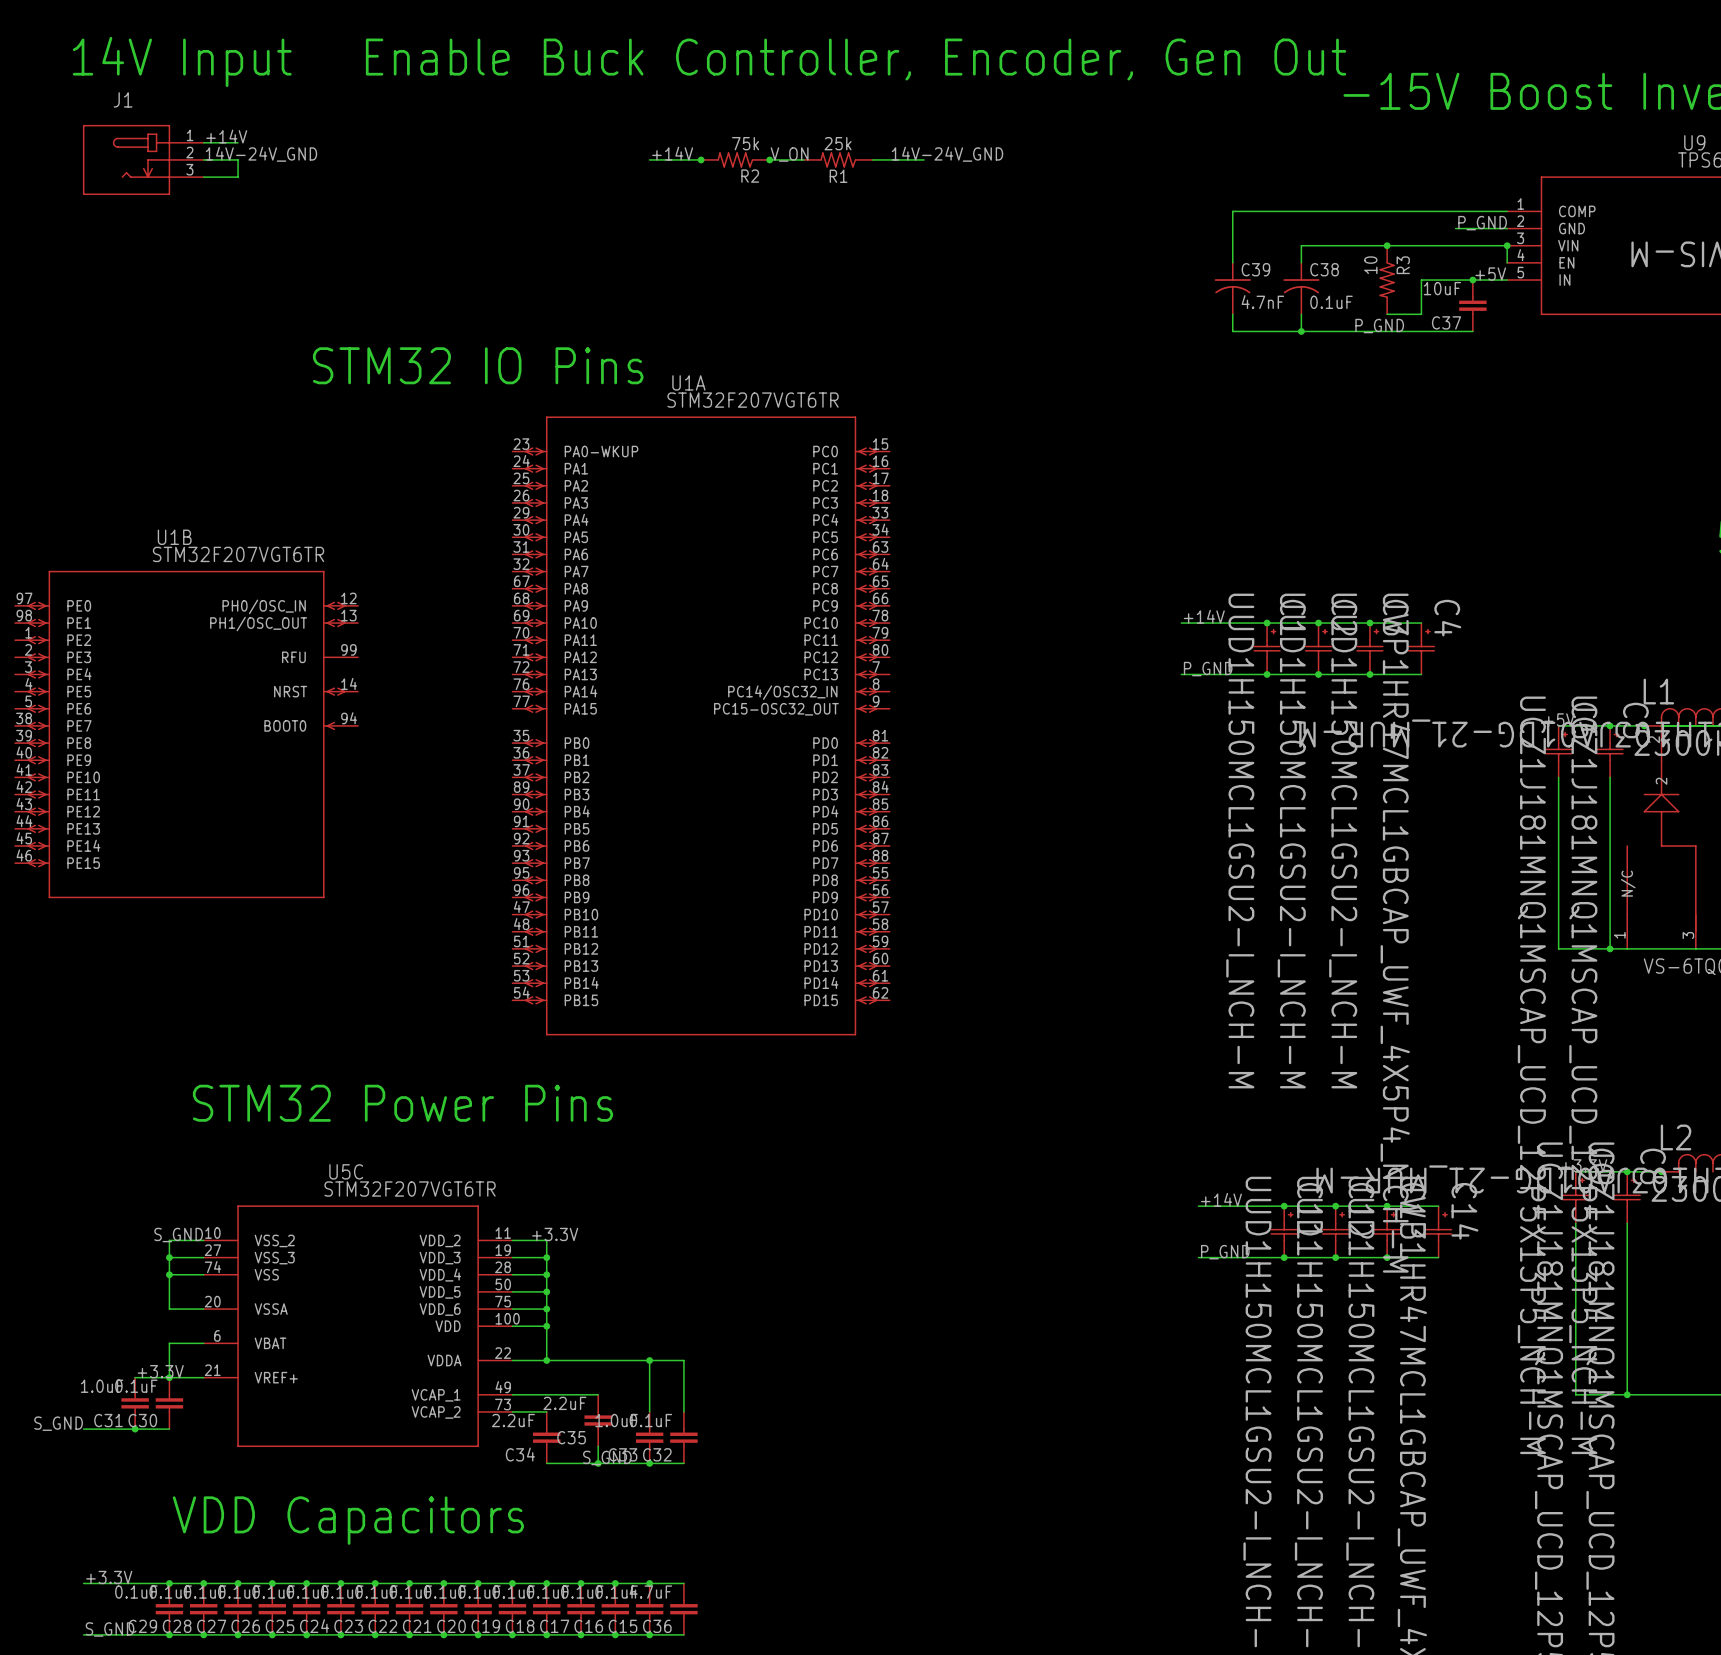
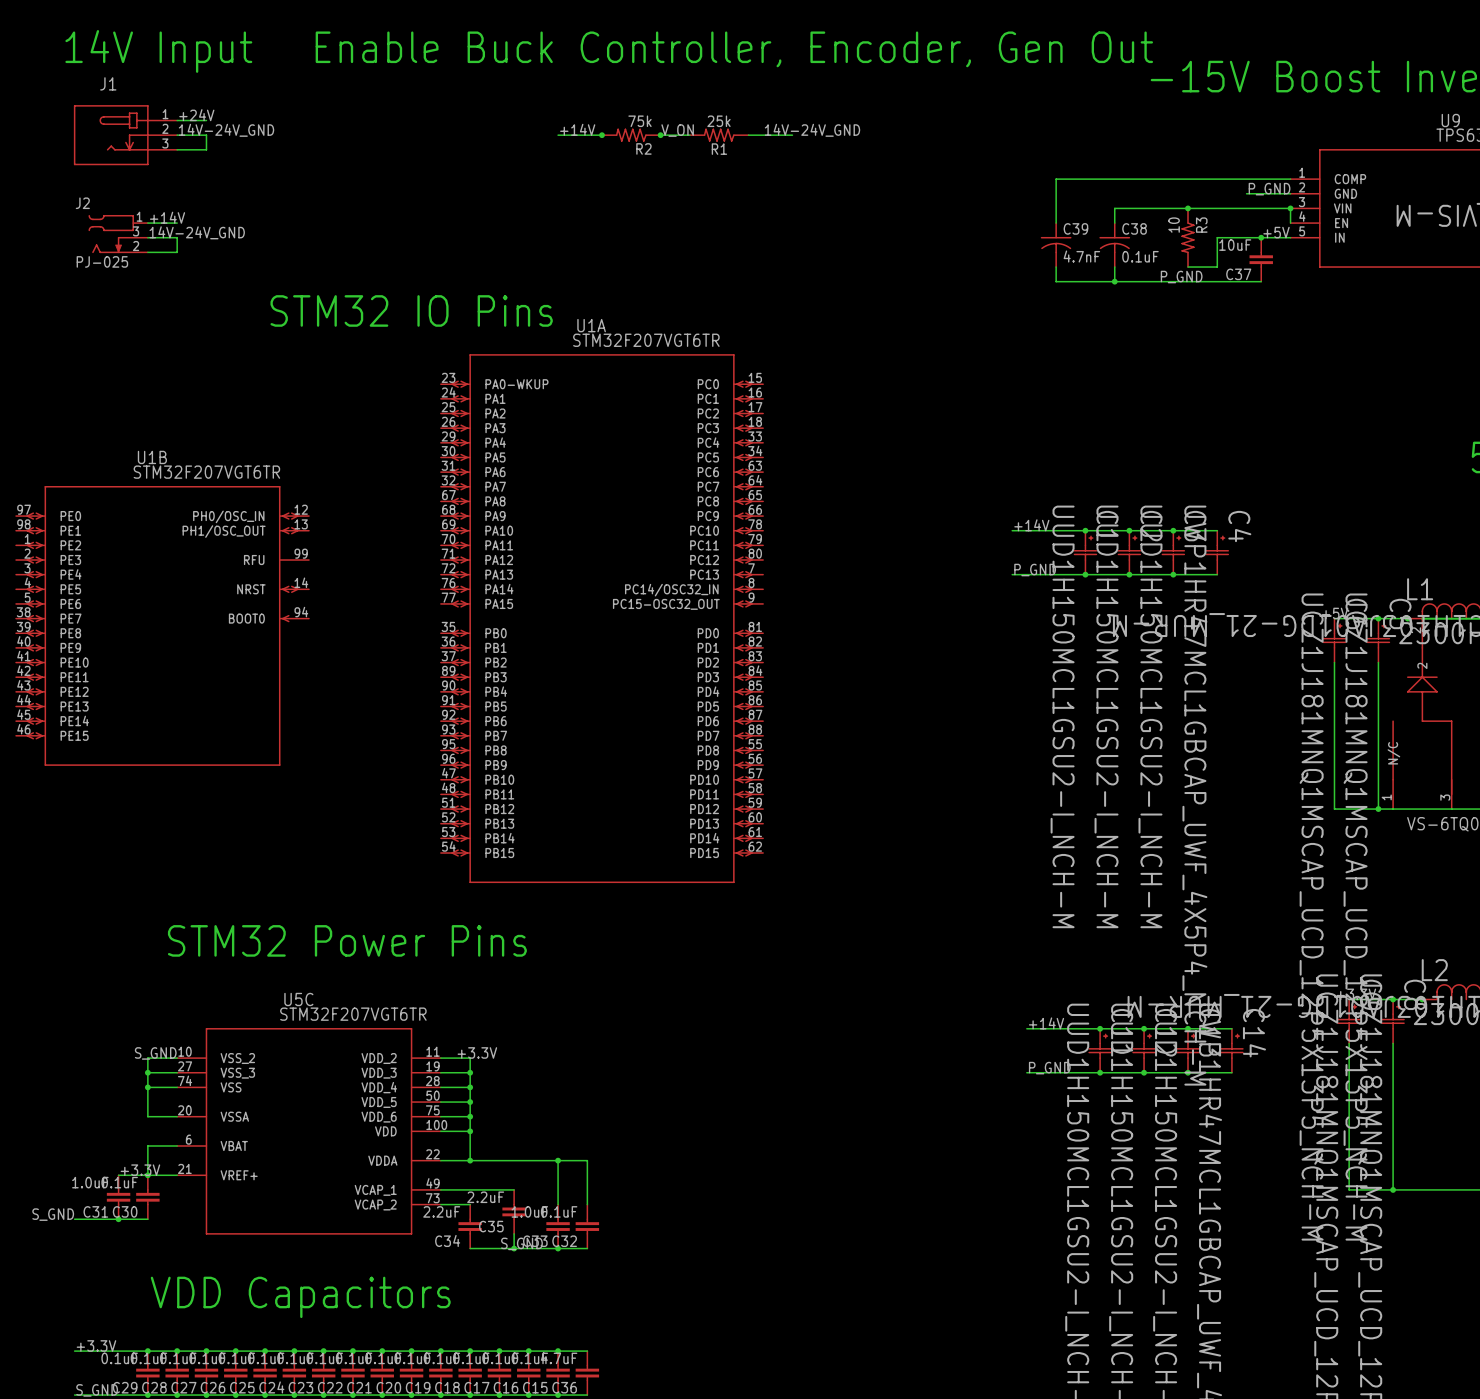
label: +14V (226, 136) -> +24V (196, 115)
label: none -> +14V (167, 217)
wire: none -> (147, 223) (177, 223)
label: none -> 14V-24V_GND (197, 232)
J2: none -> PJ-025 (118, 234)
wire: none -> (147, 237) (177, 237) (177, 252) (147, 252)

